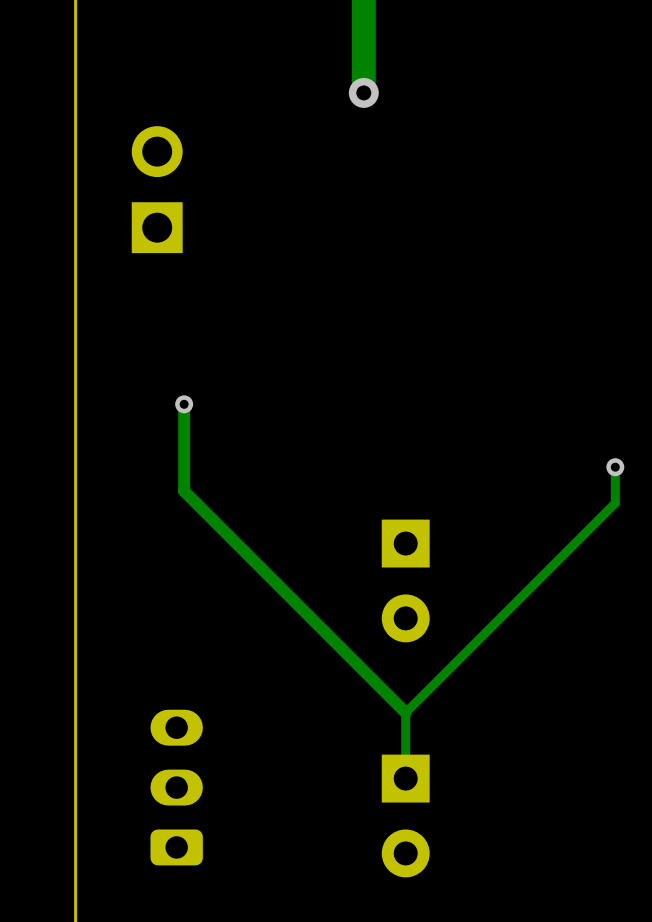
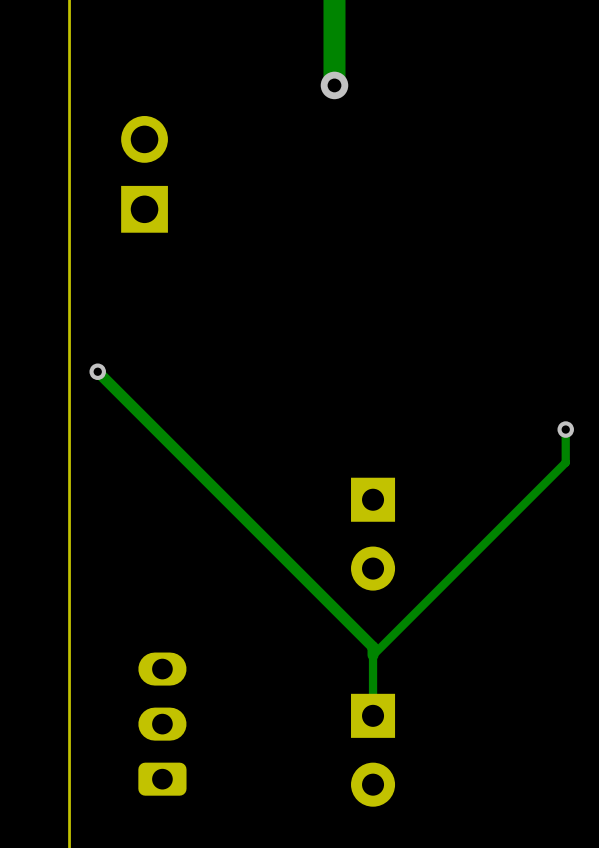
track: (184, 404) (184, 491) (405, 712) -> (97, 371) (373, 647) (373, 655)
via position: (184, 404) -> (97, 371)

